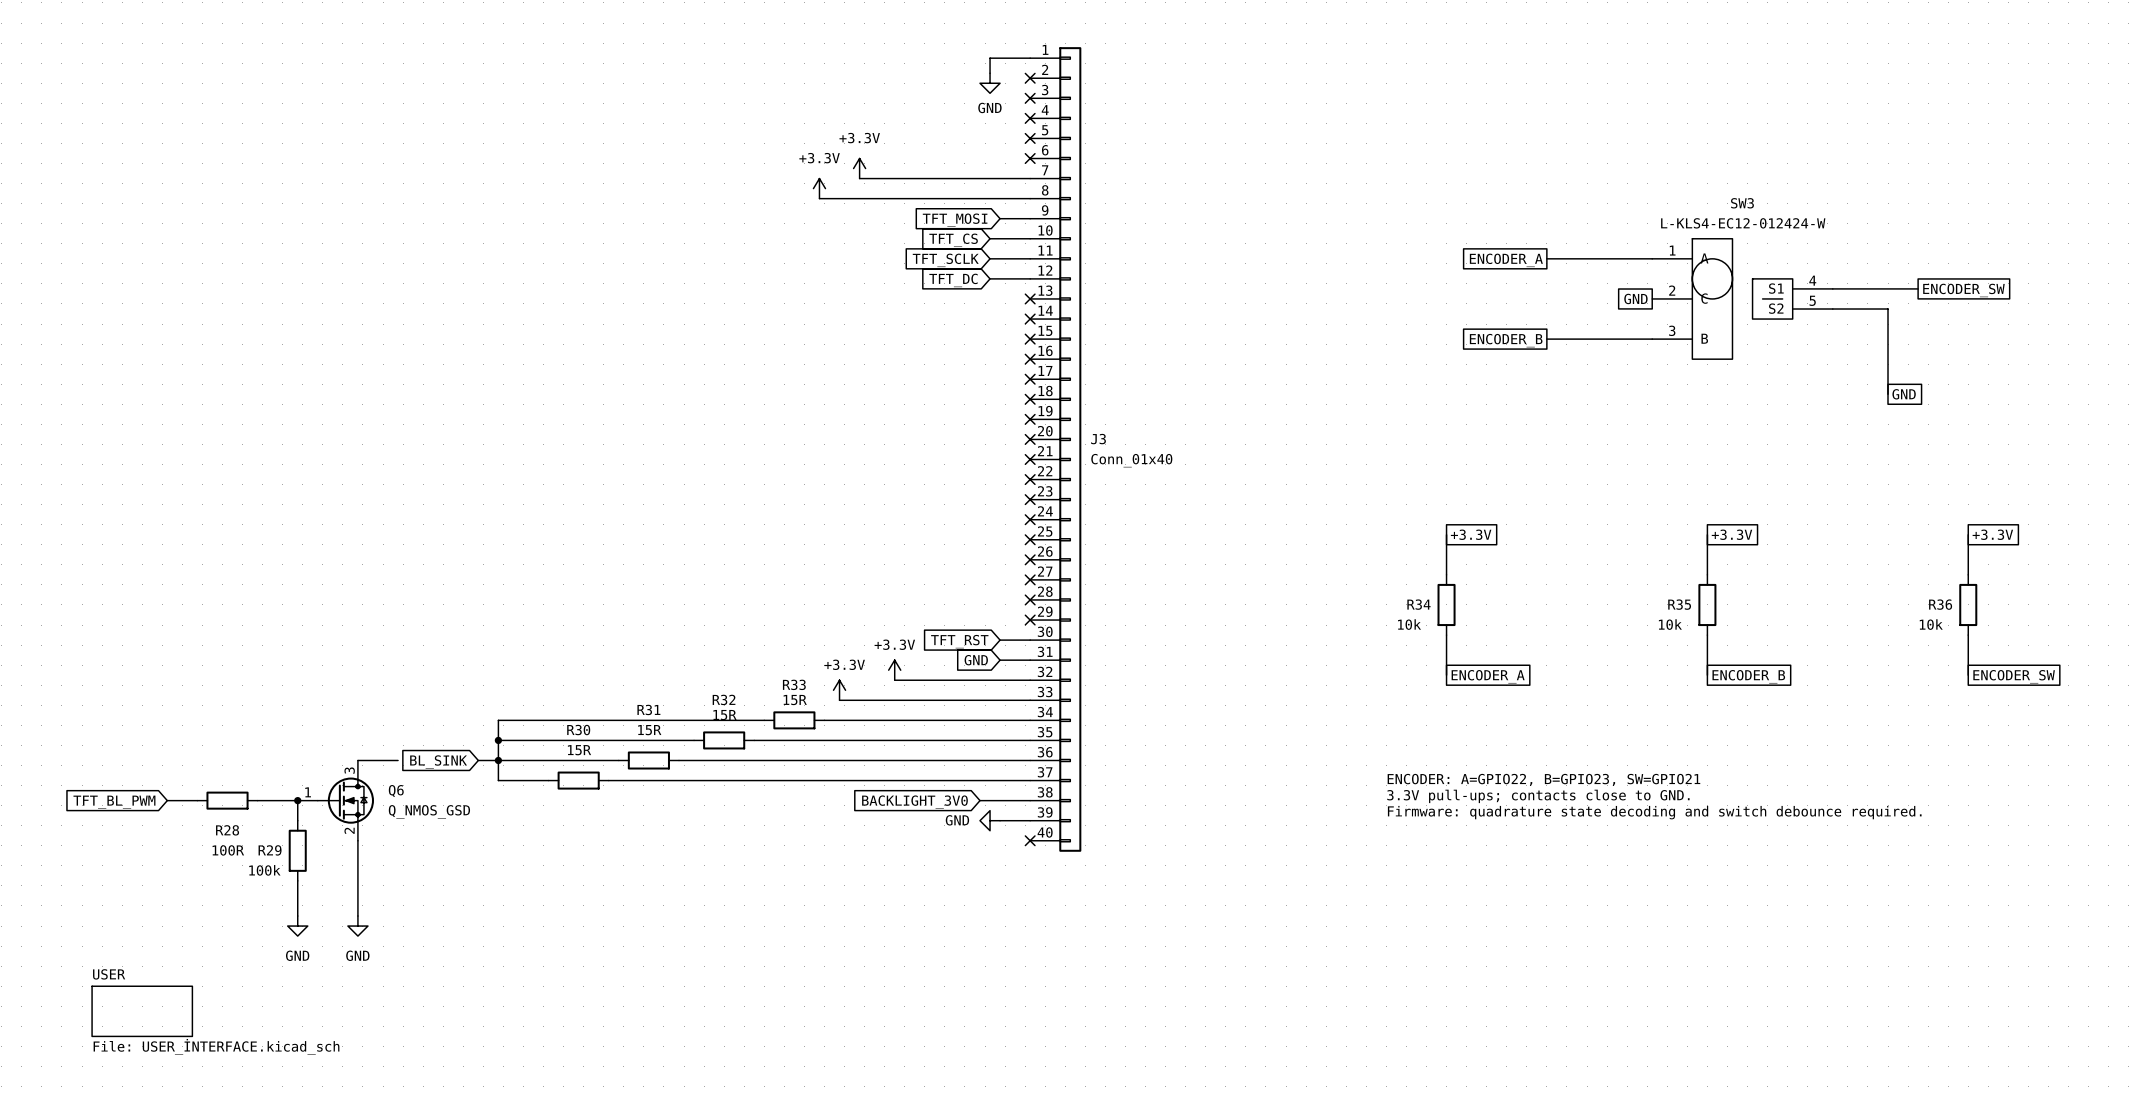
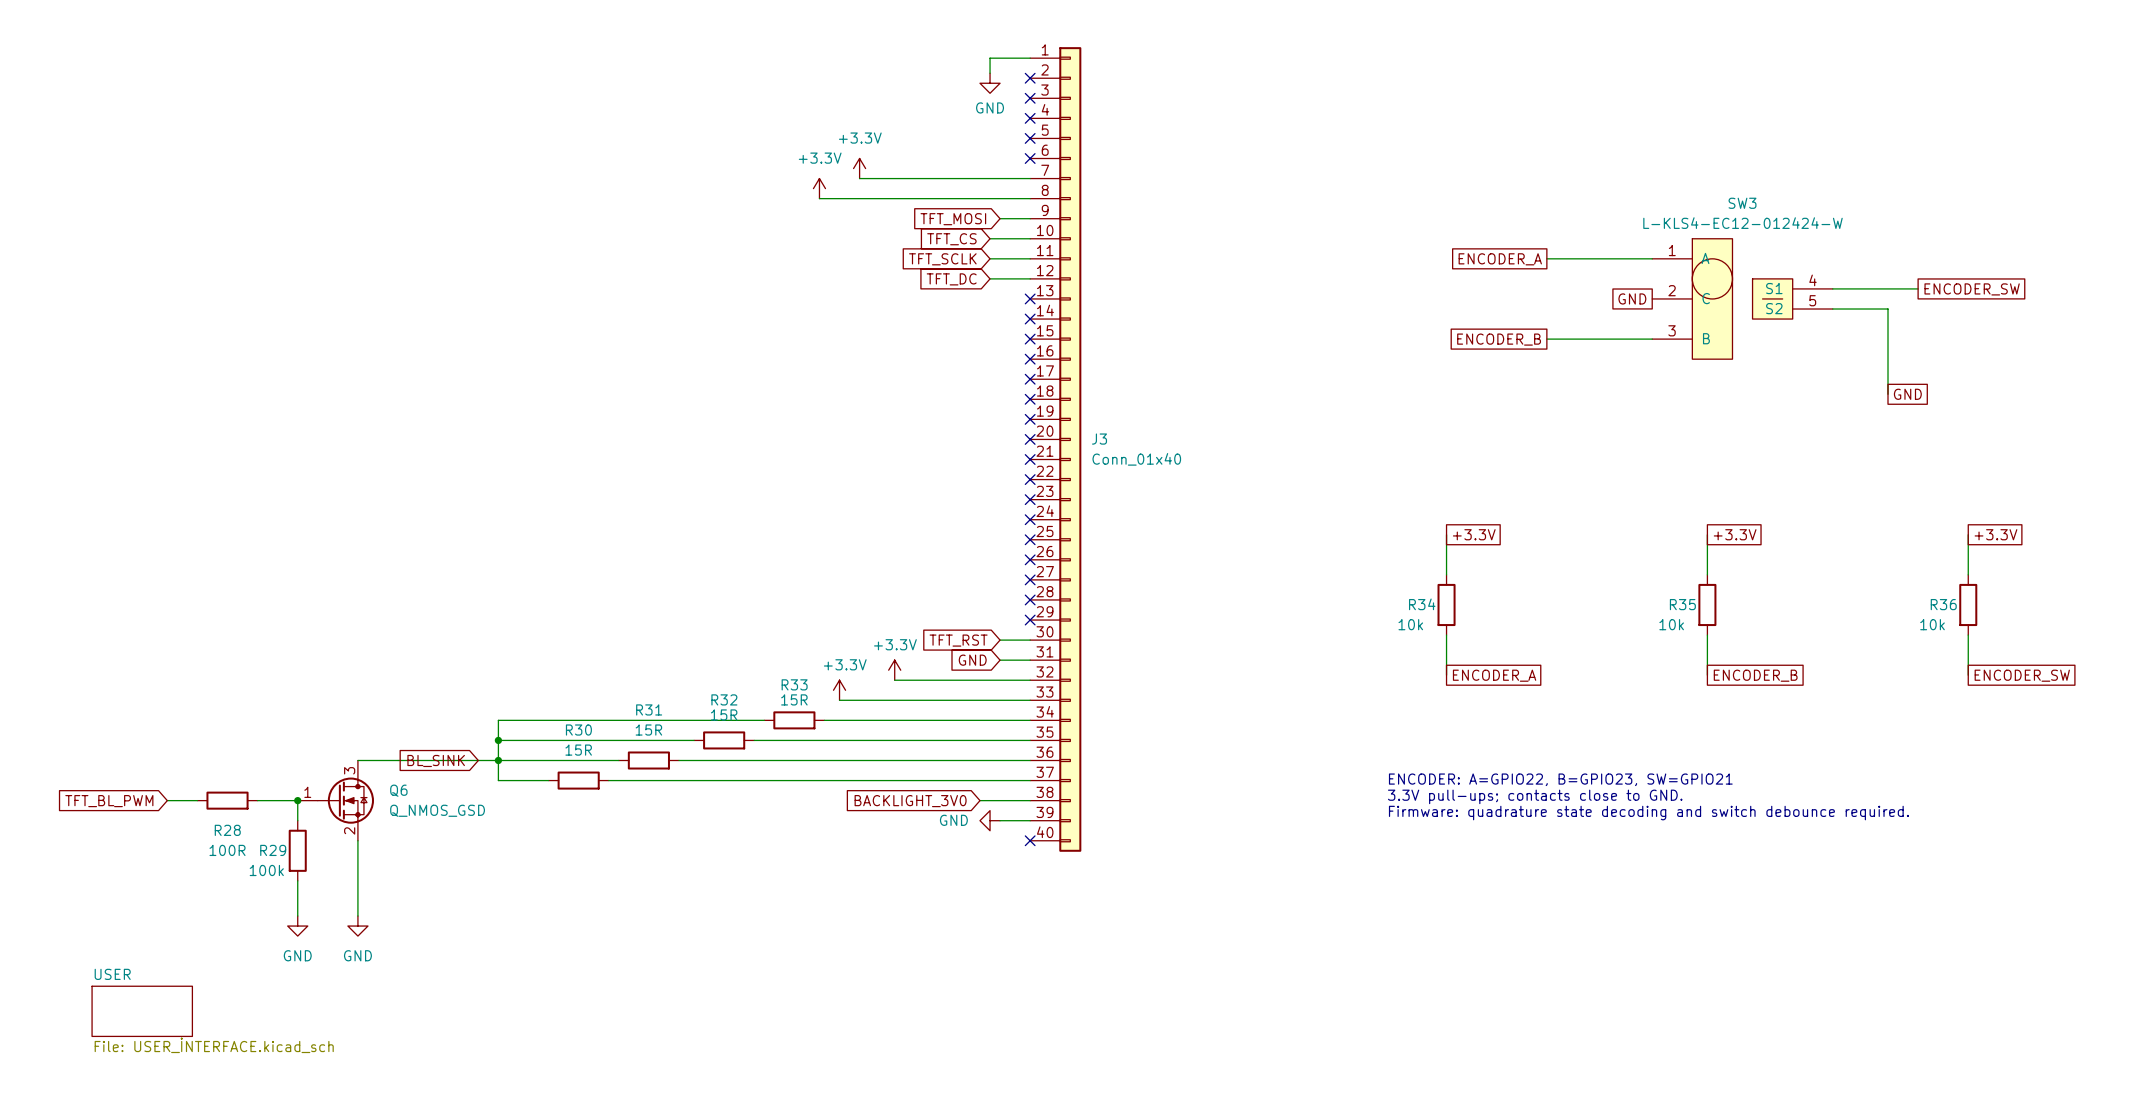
wire: none -> (398, 760) (478, 760)

